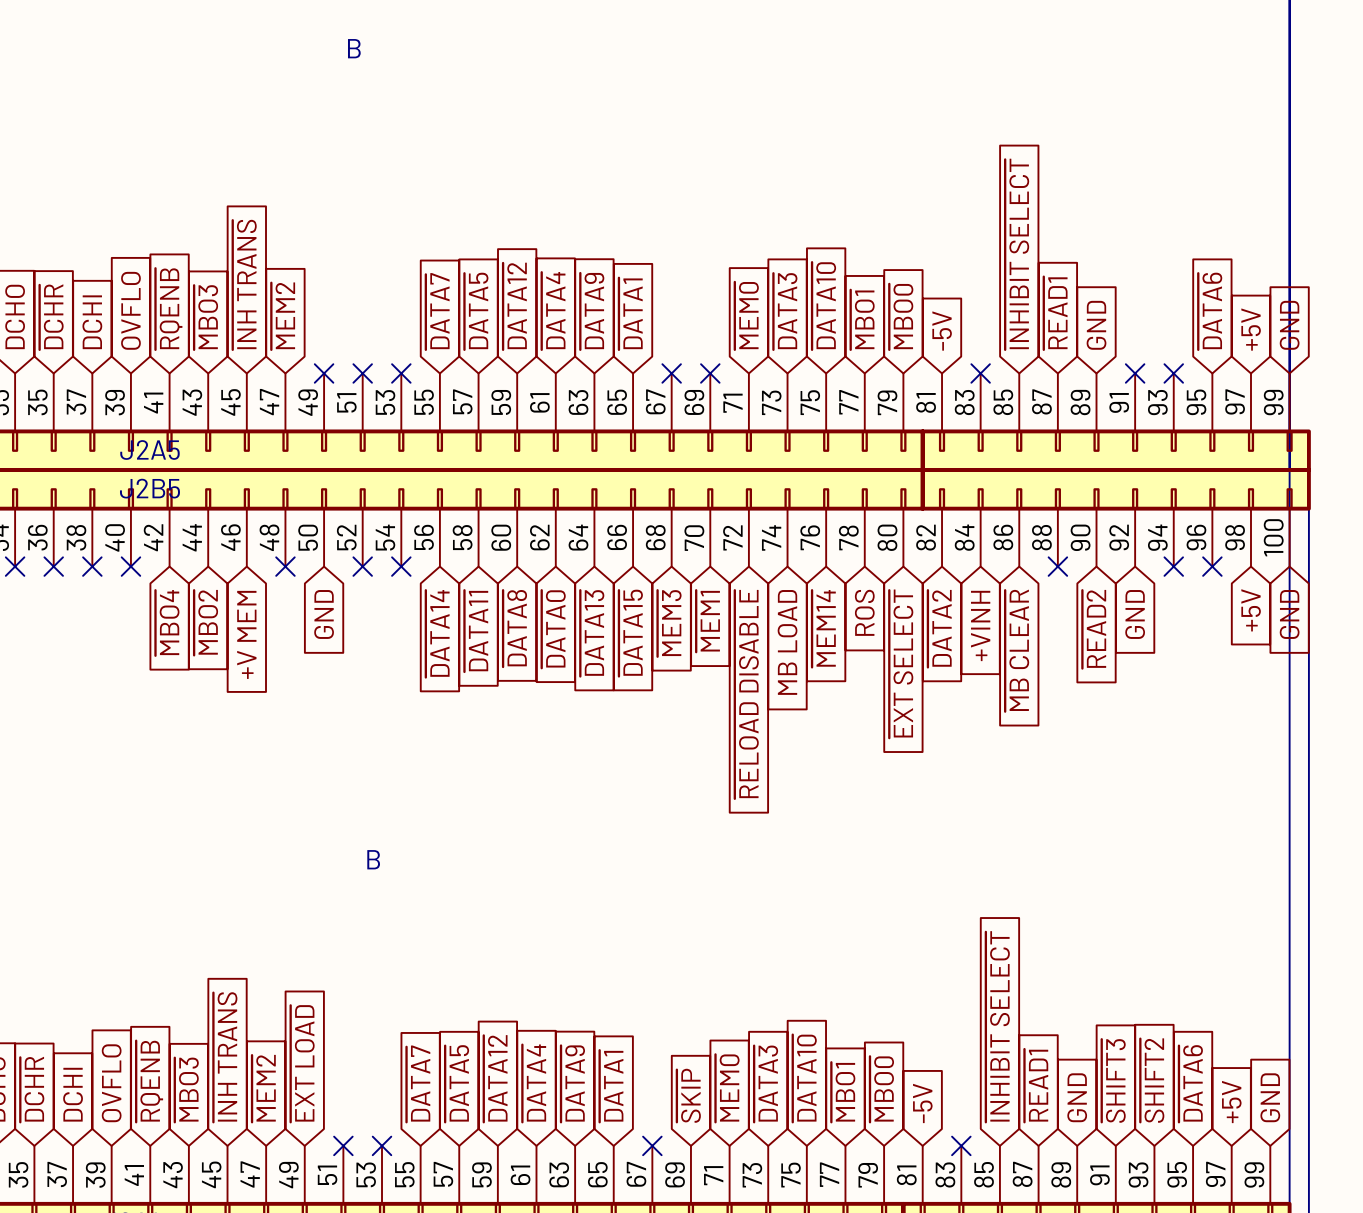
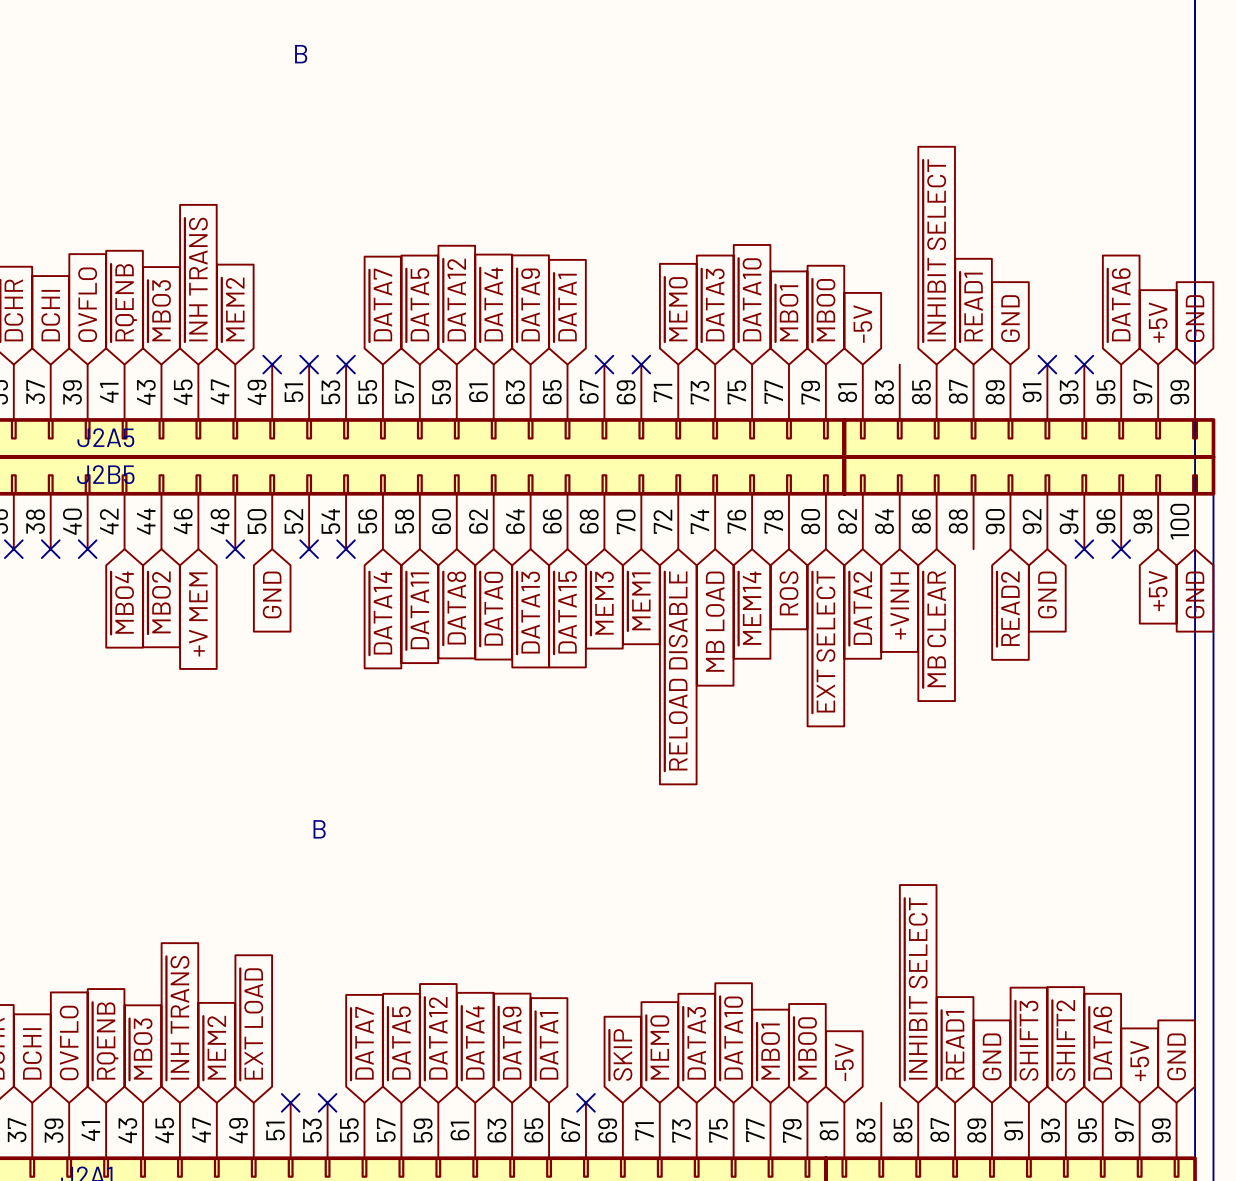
no-connect mark: (980, 373) -> none
no-connect mark: (1057, 566) -> none
no-connect mark: (961, 1145) -> none

